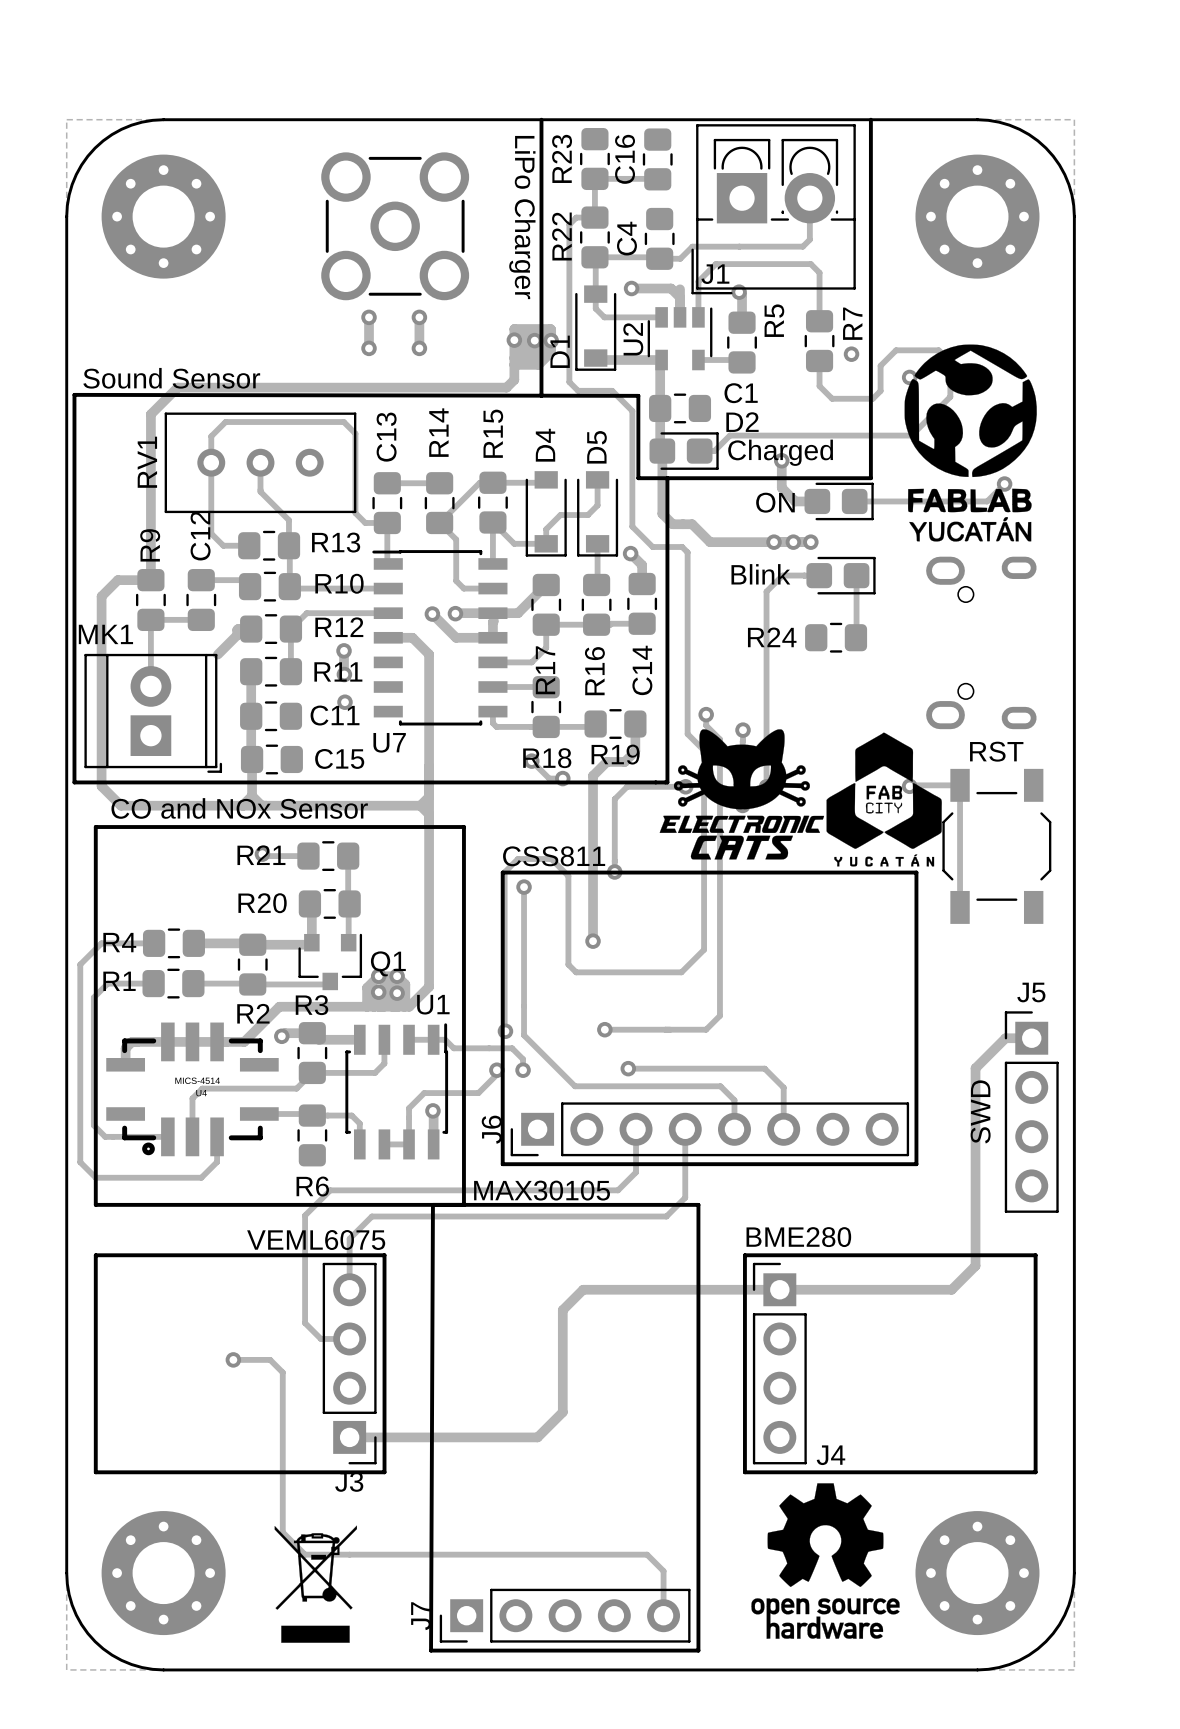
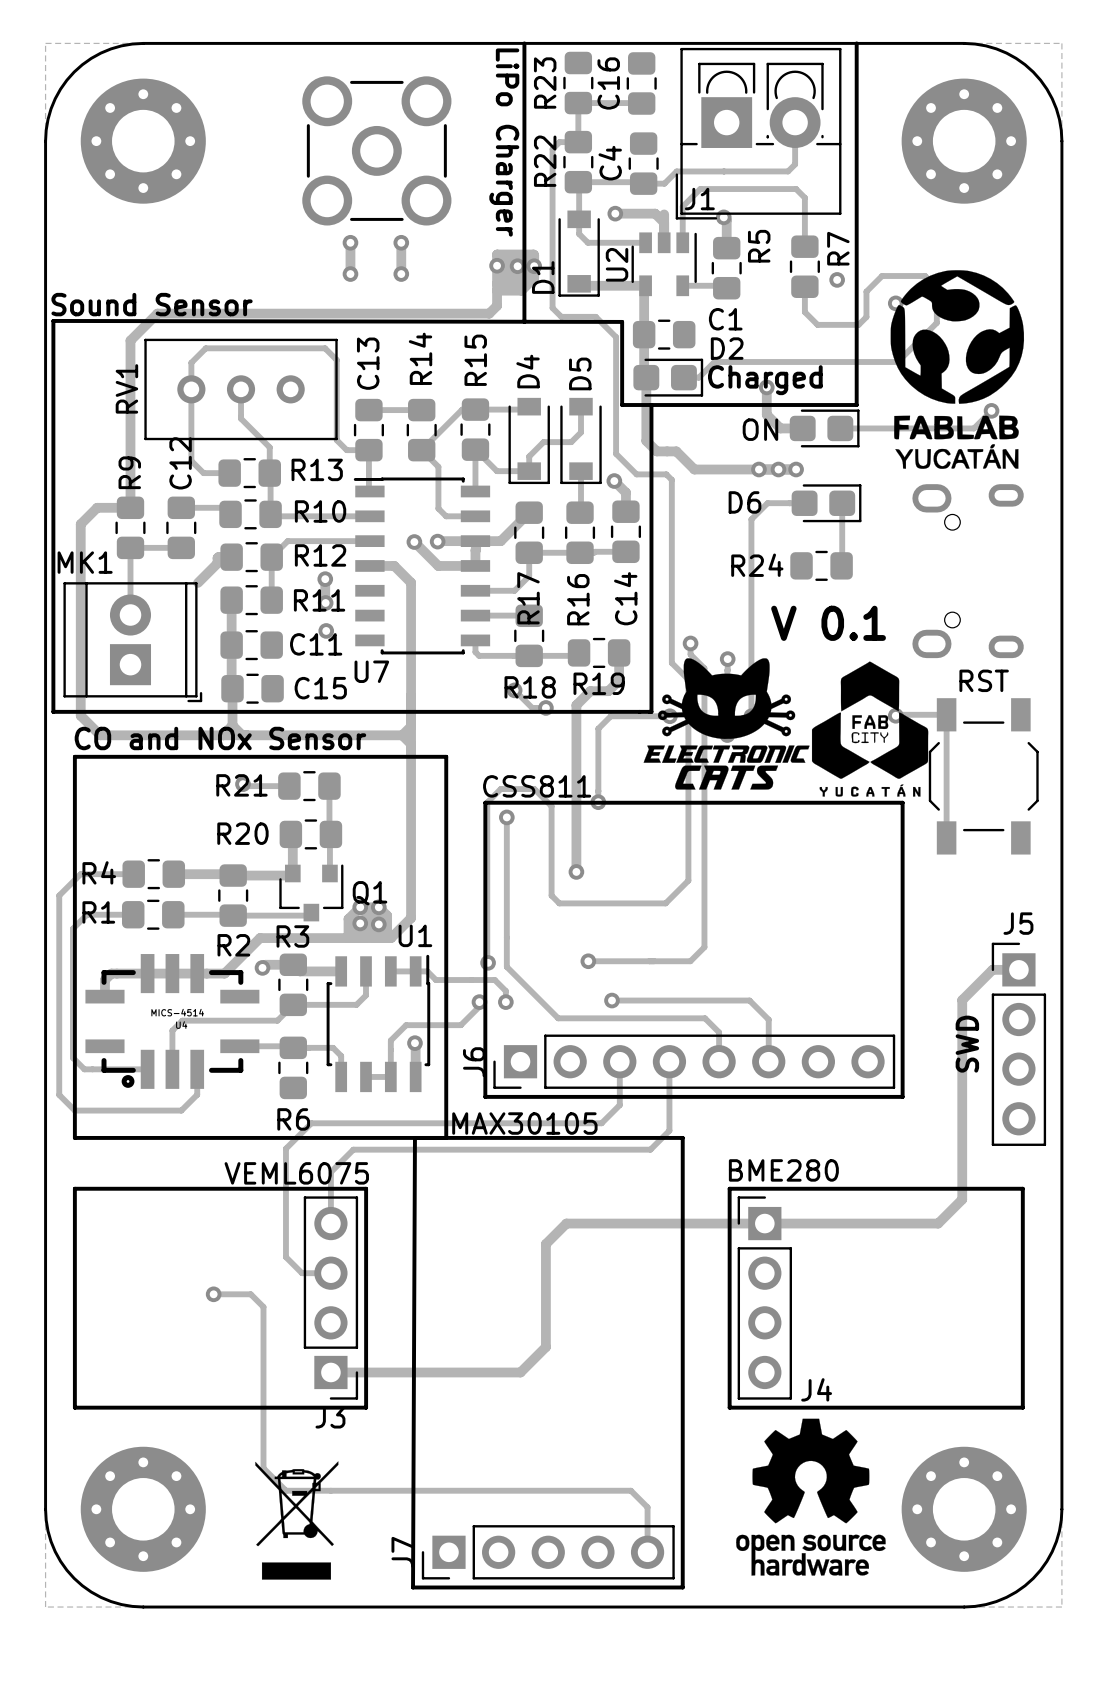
Blink name: Blink (760, 574) -> D6 (744, 502)
text: none -> V 0.1 (828, 623)

